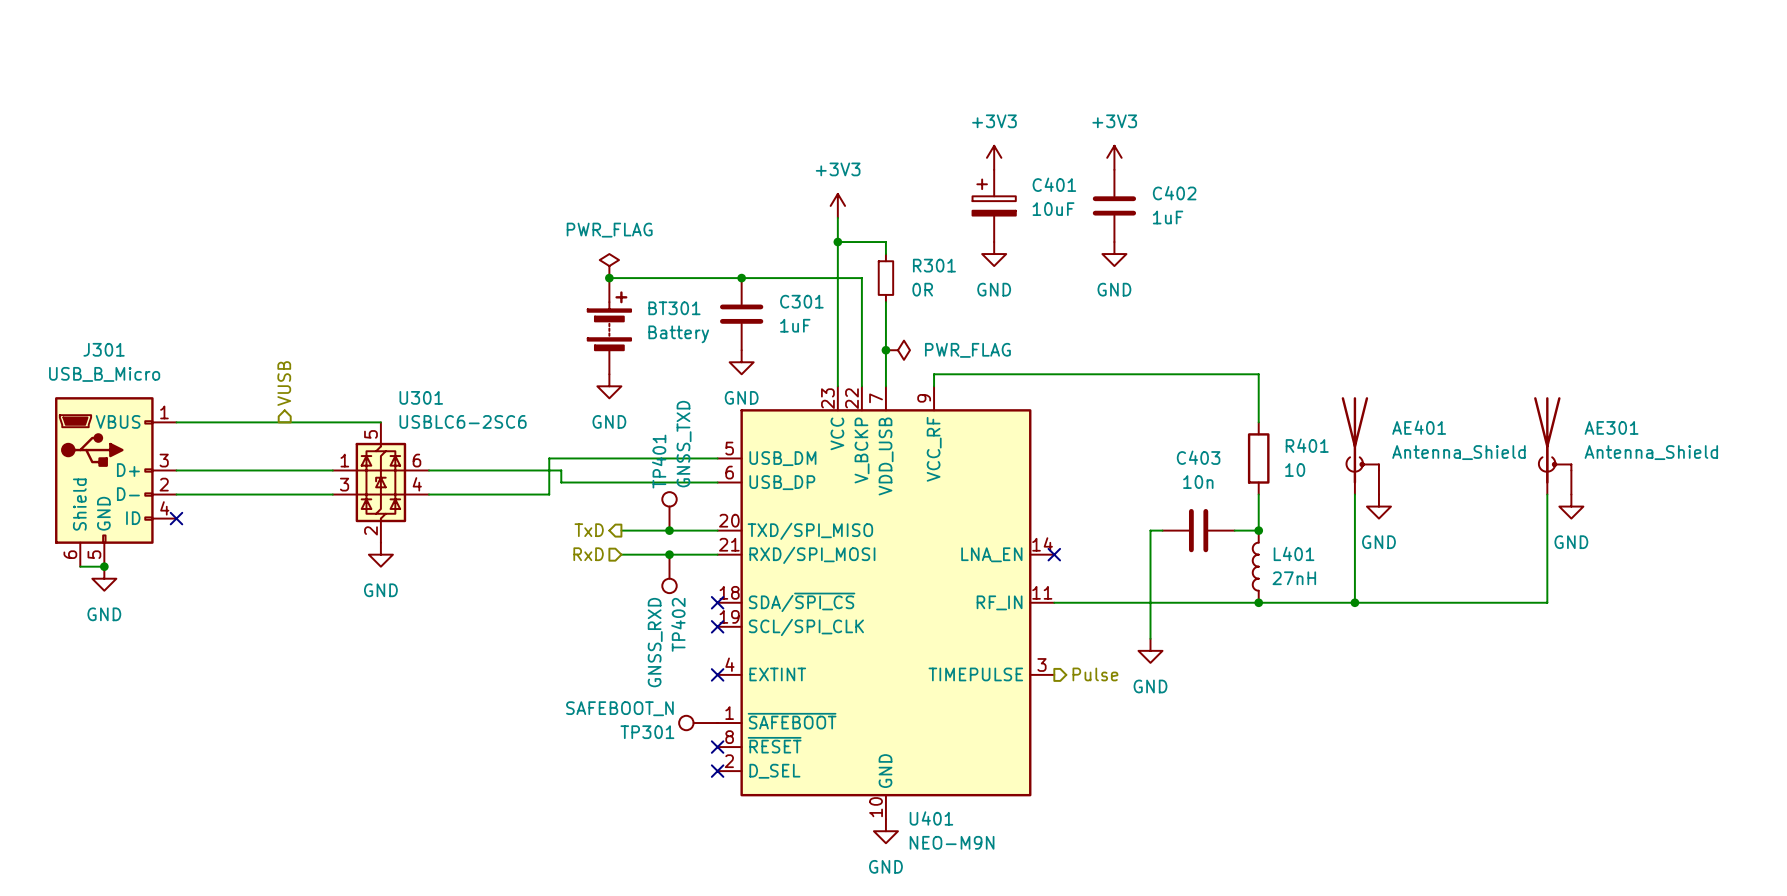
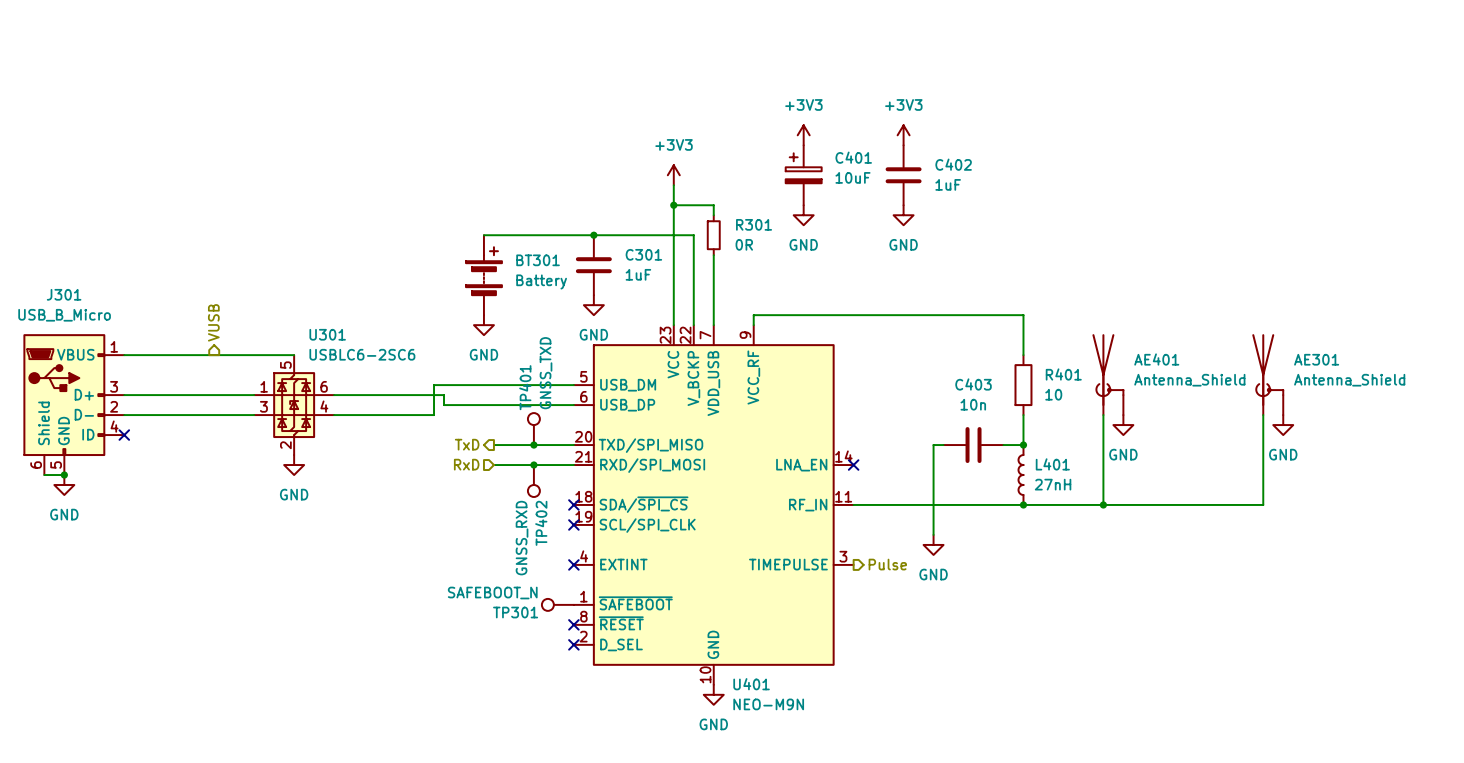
power symbol: PWR_FLAG (609, 266) -> none
junction: (609, 278) -> none
junction: (885, 350) -> none
power symbol: PWR_FLAG (897, 350) -> none

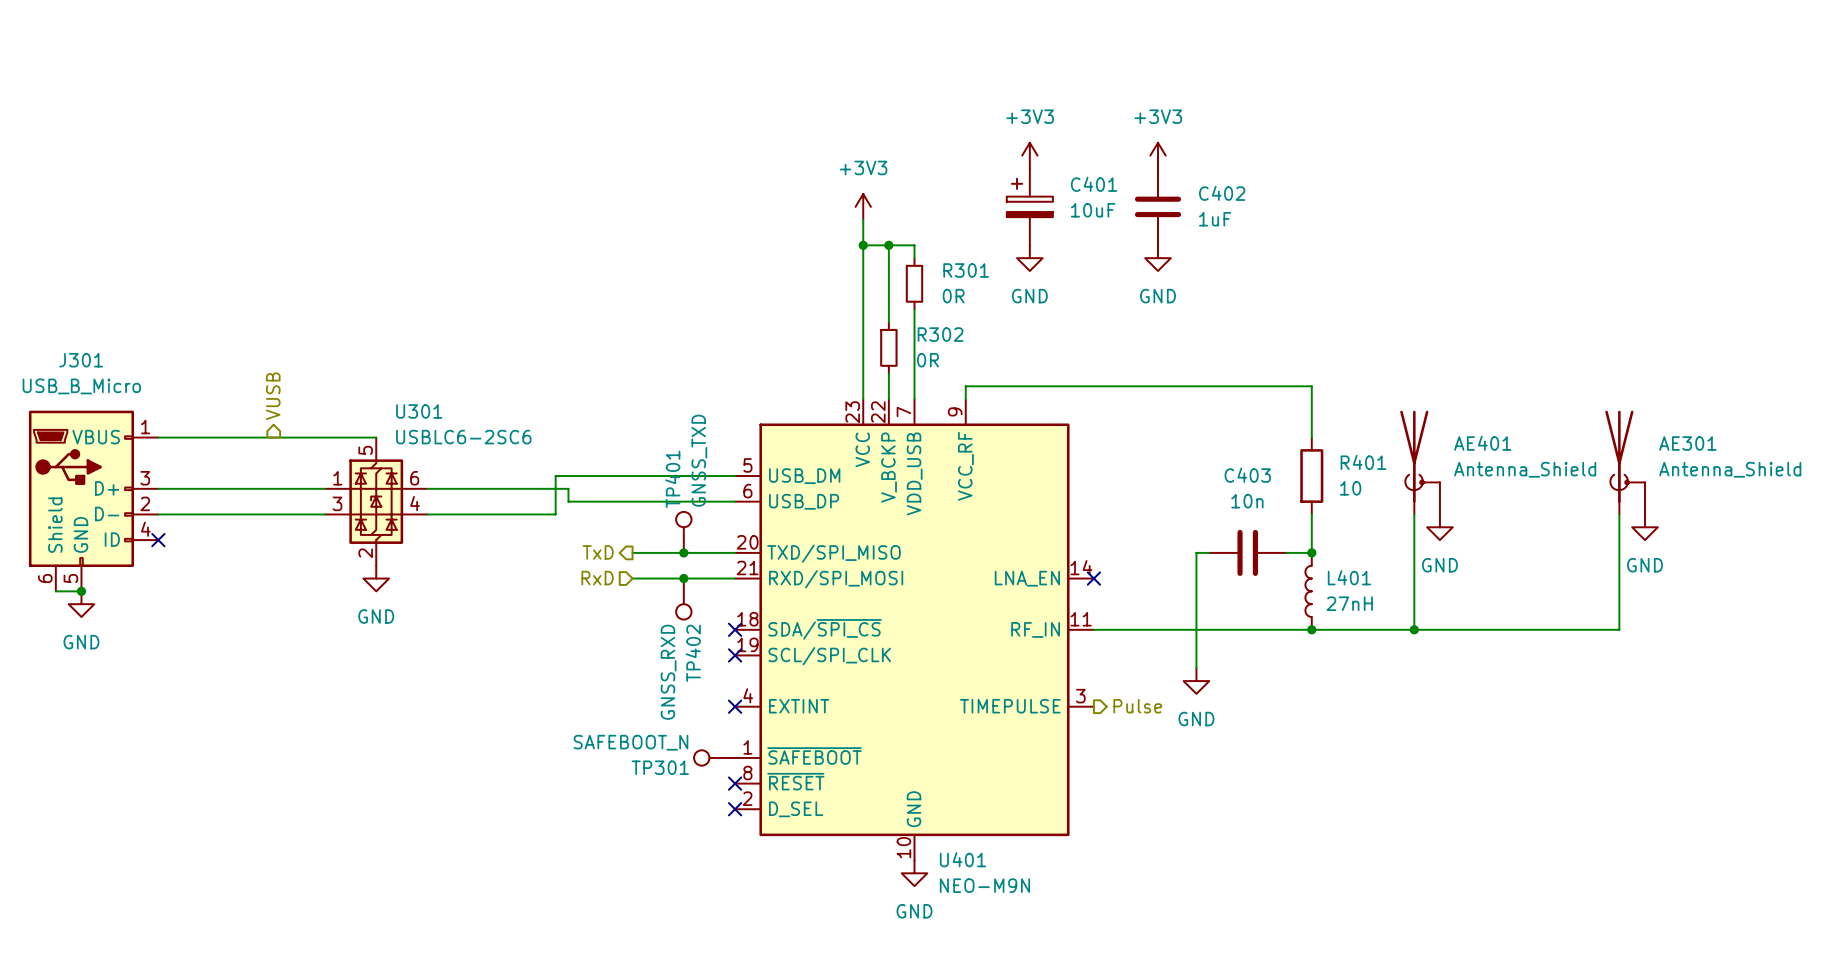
junction: none -> (888, 245)
wire: (483, 235) (693, 235) -> (888, 245) (888, 283)
junction: (593, 235) -> none
C301: 1uF (593, 265) -> none
wire: (693, 265) (693, 305) -> none
BT301: Battery (483, 275) -> none
R302: none -> 0R (888, 347)
power symbol: GND (593, 305) -> none
power symbol: GND (483, 325) -> none

